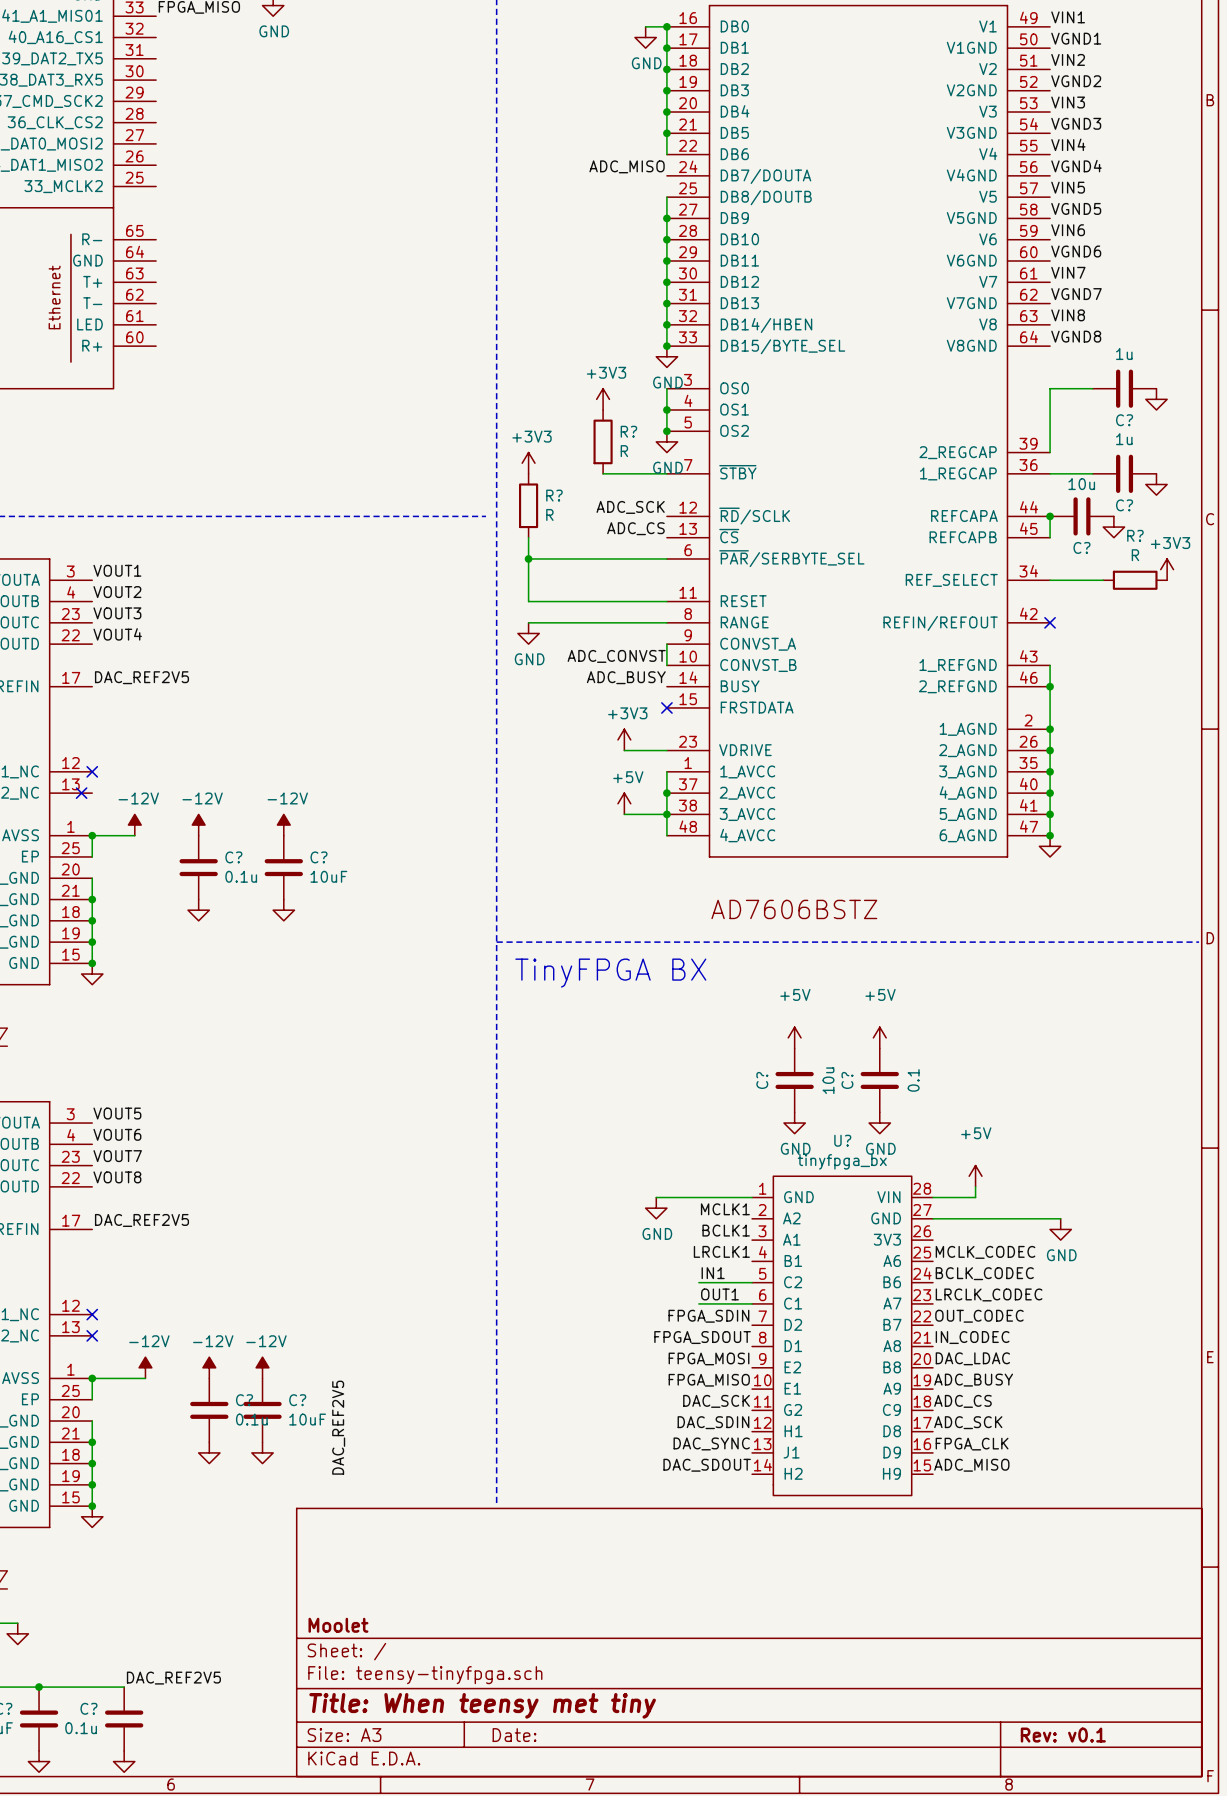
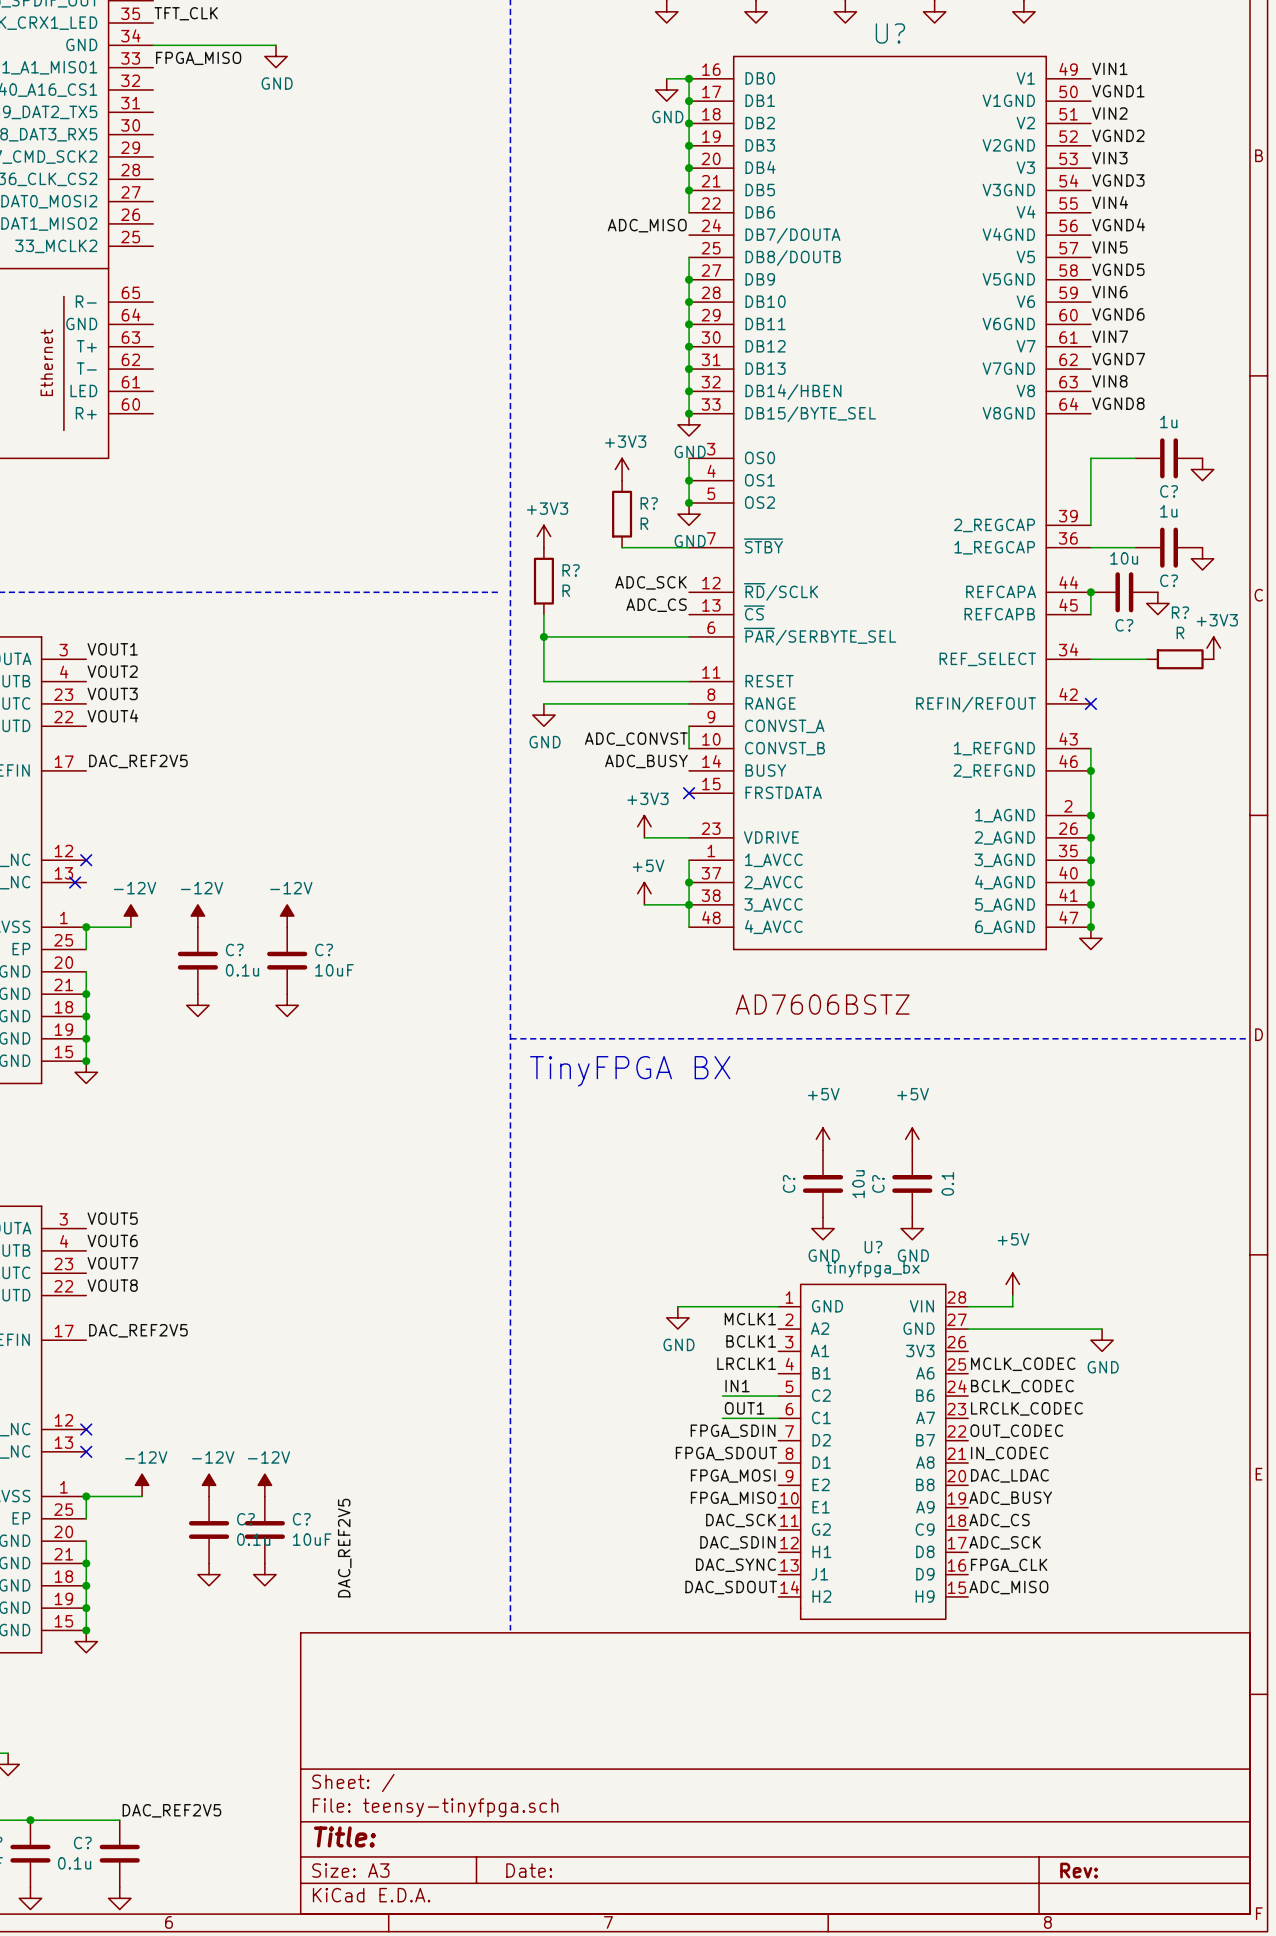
title block: Moolet (338, 1625) -> none
title block: Title: When teensy met tiny (482, 1705) -> Title: (344, 1836)
title block: Rev: v0.1 (1063, 1735) -> Rev: (1079, 1870)

